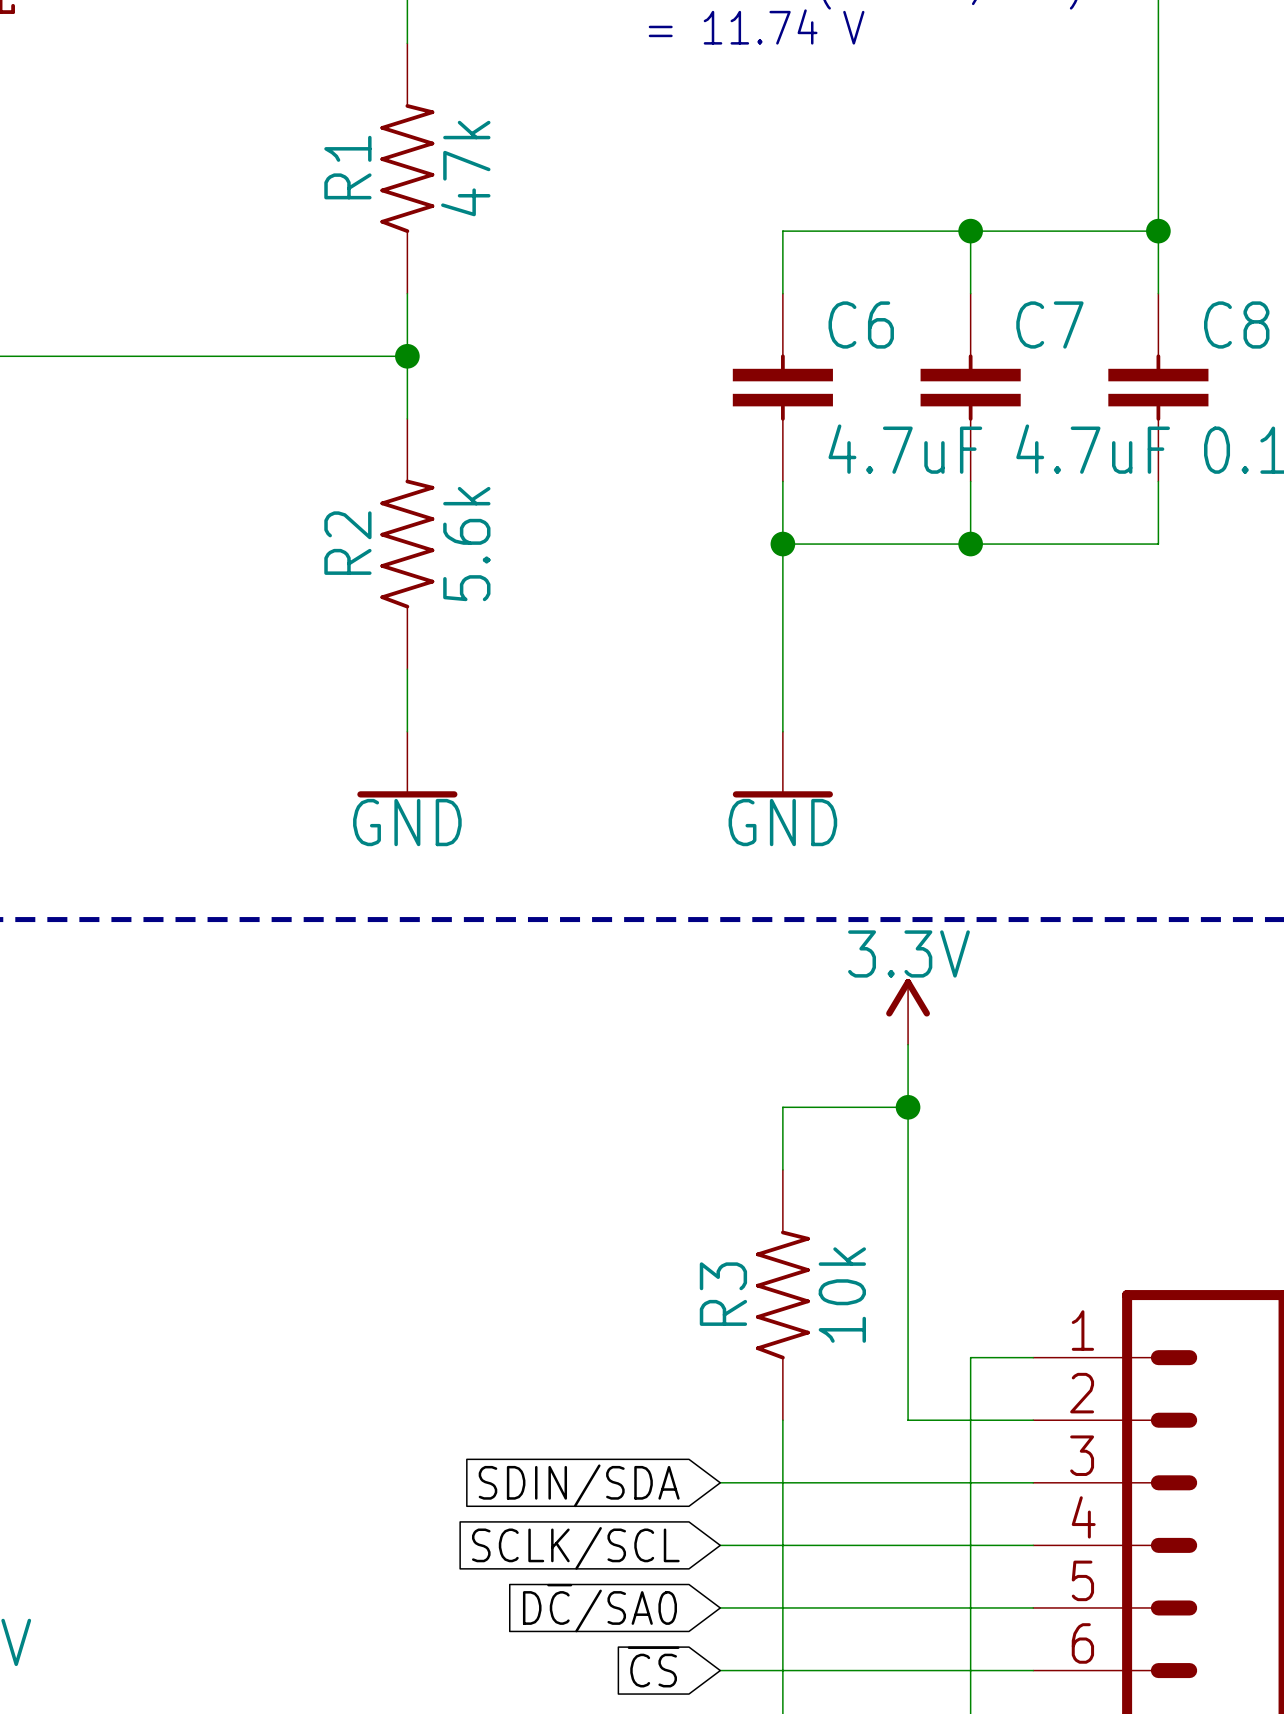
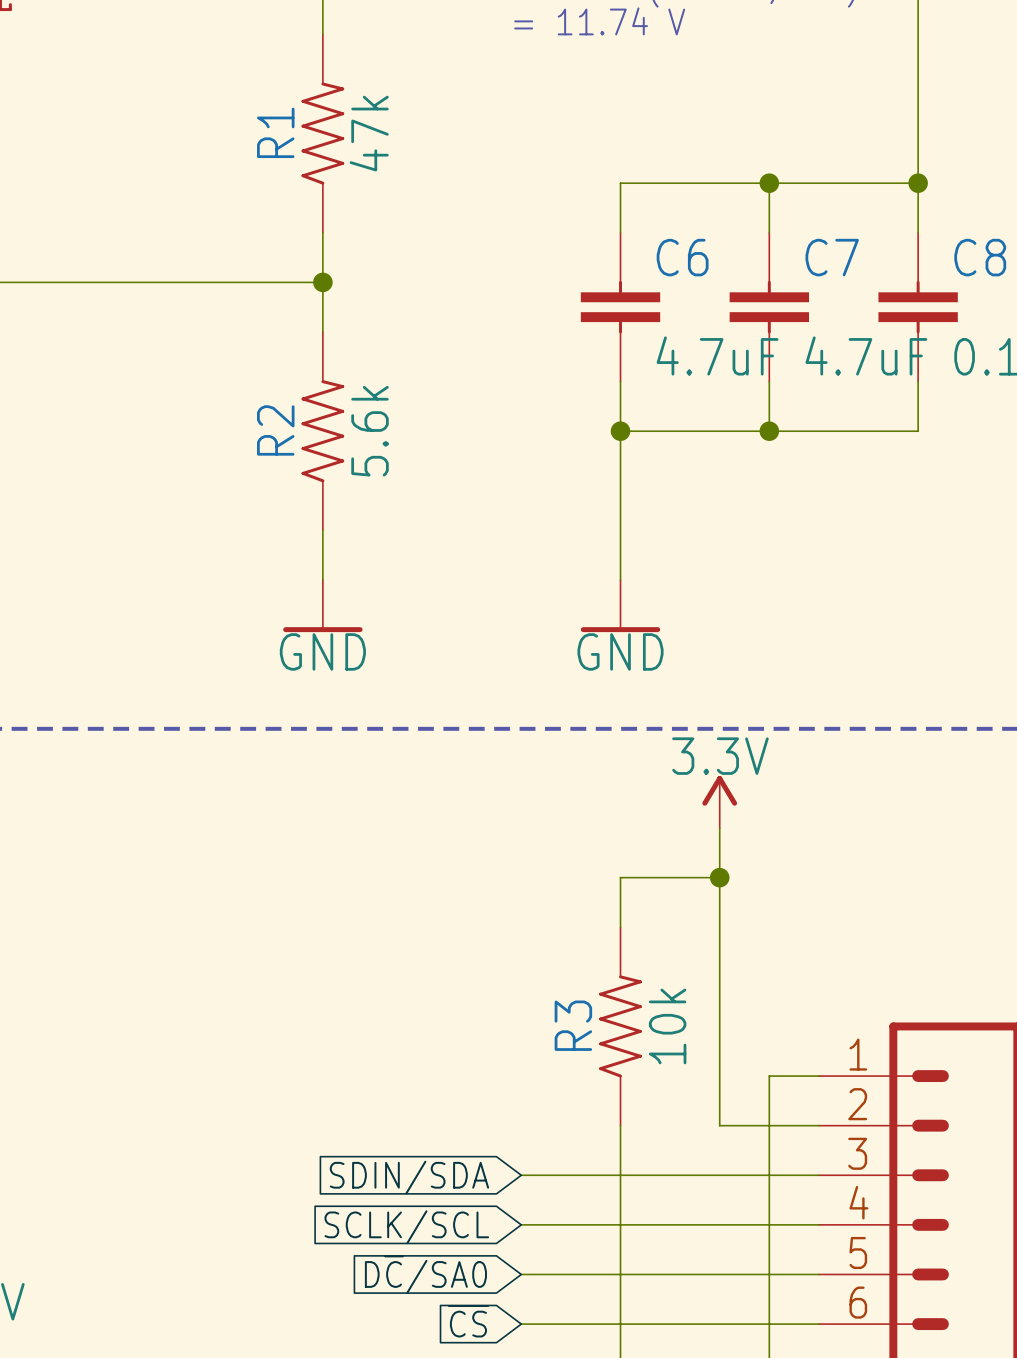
wire: none -> (521, 1175) (570, 1175)
global label position: SDIN/SDA (579, 1485) -> SDIN/SDA (409, 1177)
wire: none -> (521, 1224) (570, 1224)
global label position: SCLK/SCL (575, 1548) -> SCLK/SCL (406, 1227)
wire: none -> (521, 1274) (570, 1274)
global label position: D~{C}/SA0 (599, 1608) -> D~{C}/SA0 (425, 1274)
global label position: ~{CS} (653, 1666) -> ~{CS} (468, 1321)
wire: none -> (521, 1324) (570, 1324)

